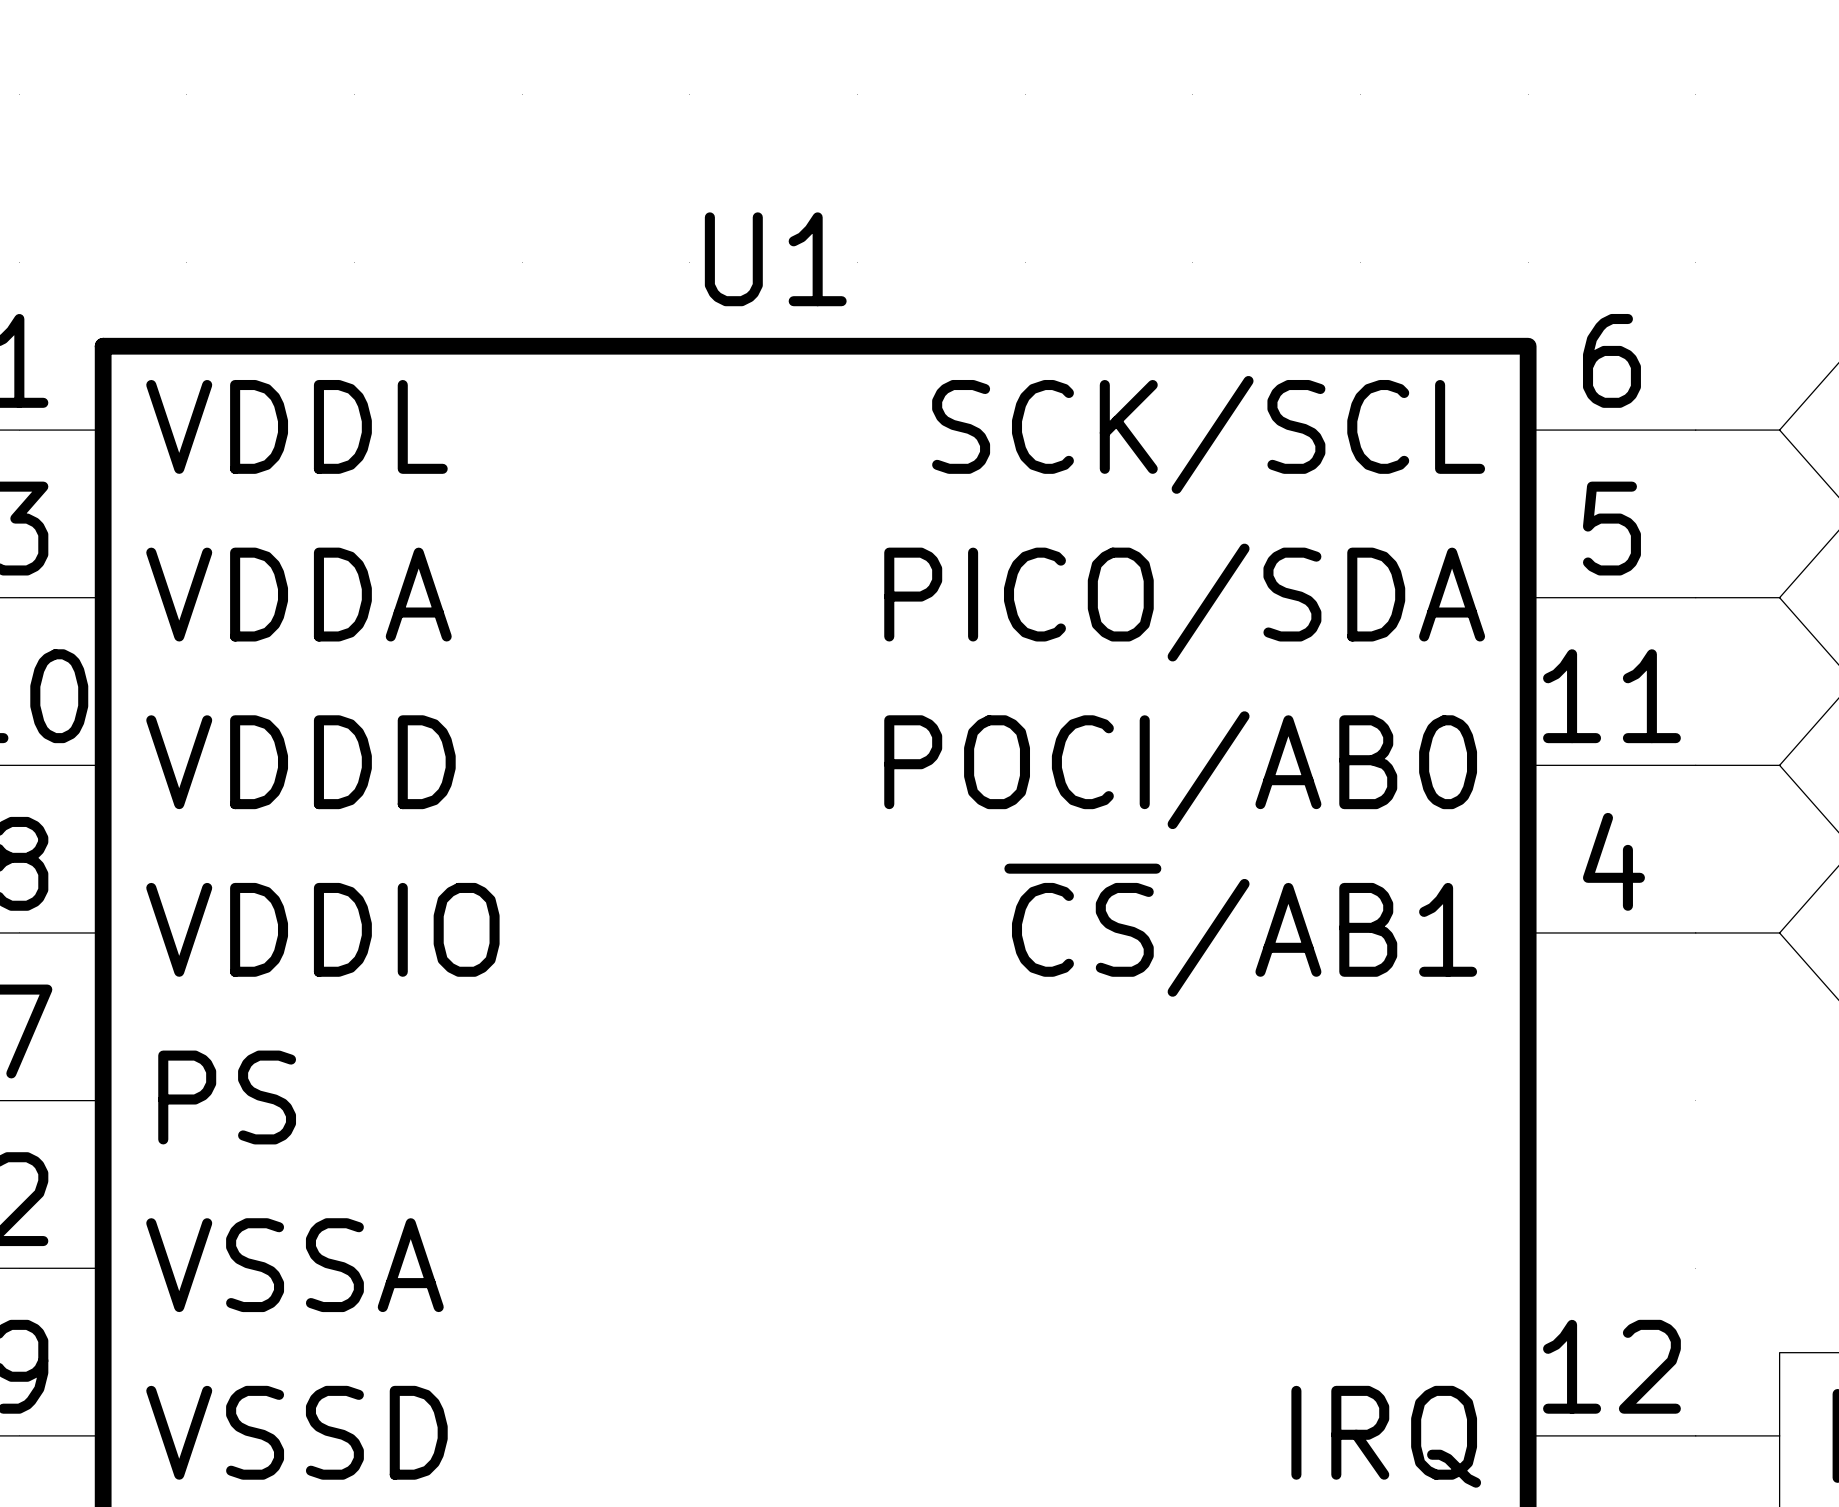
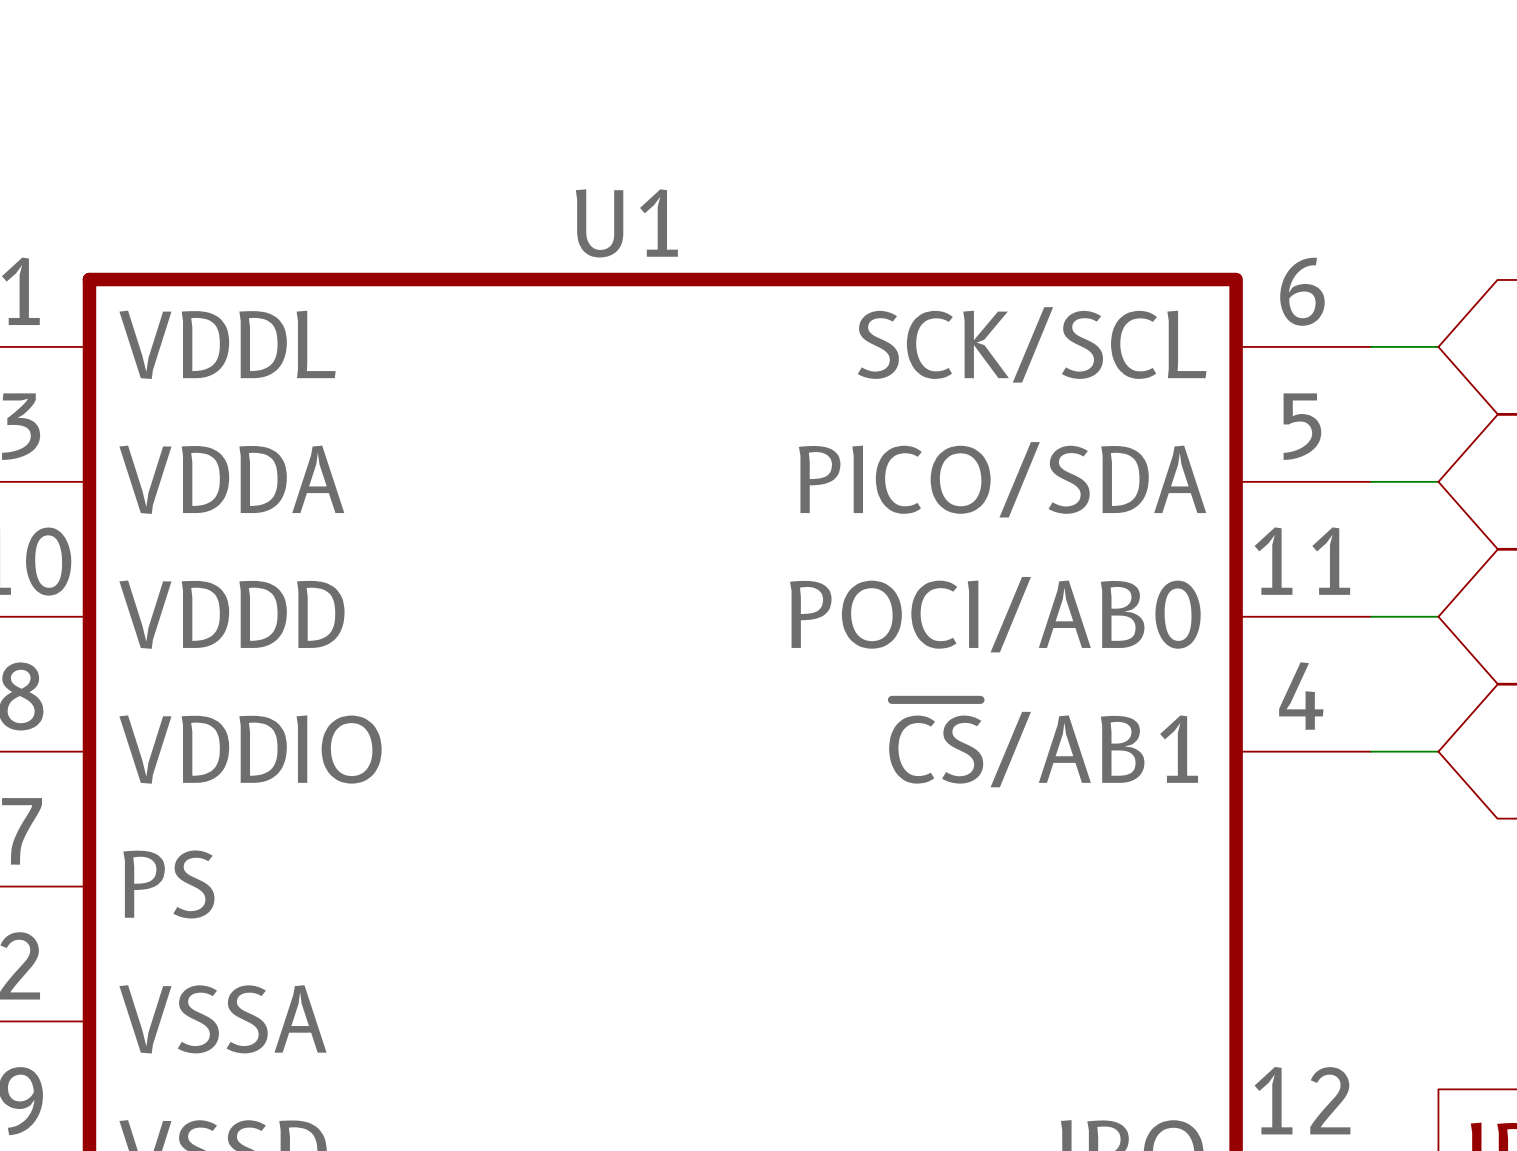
U1 name position: U1 (775, 259) -> U1 (626, 223)

